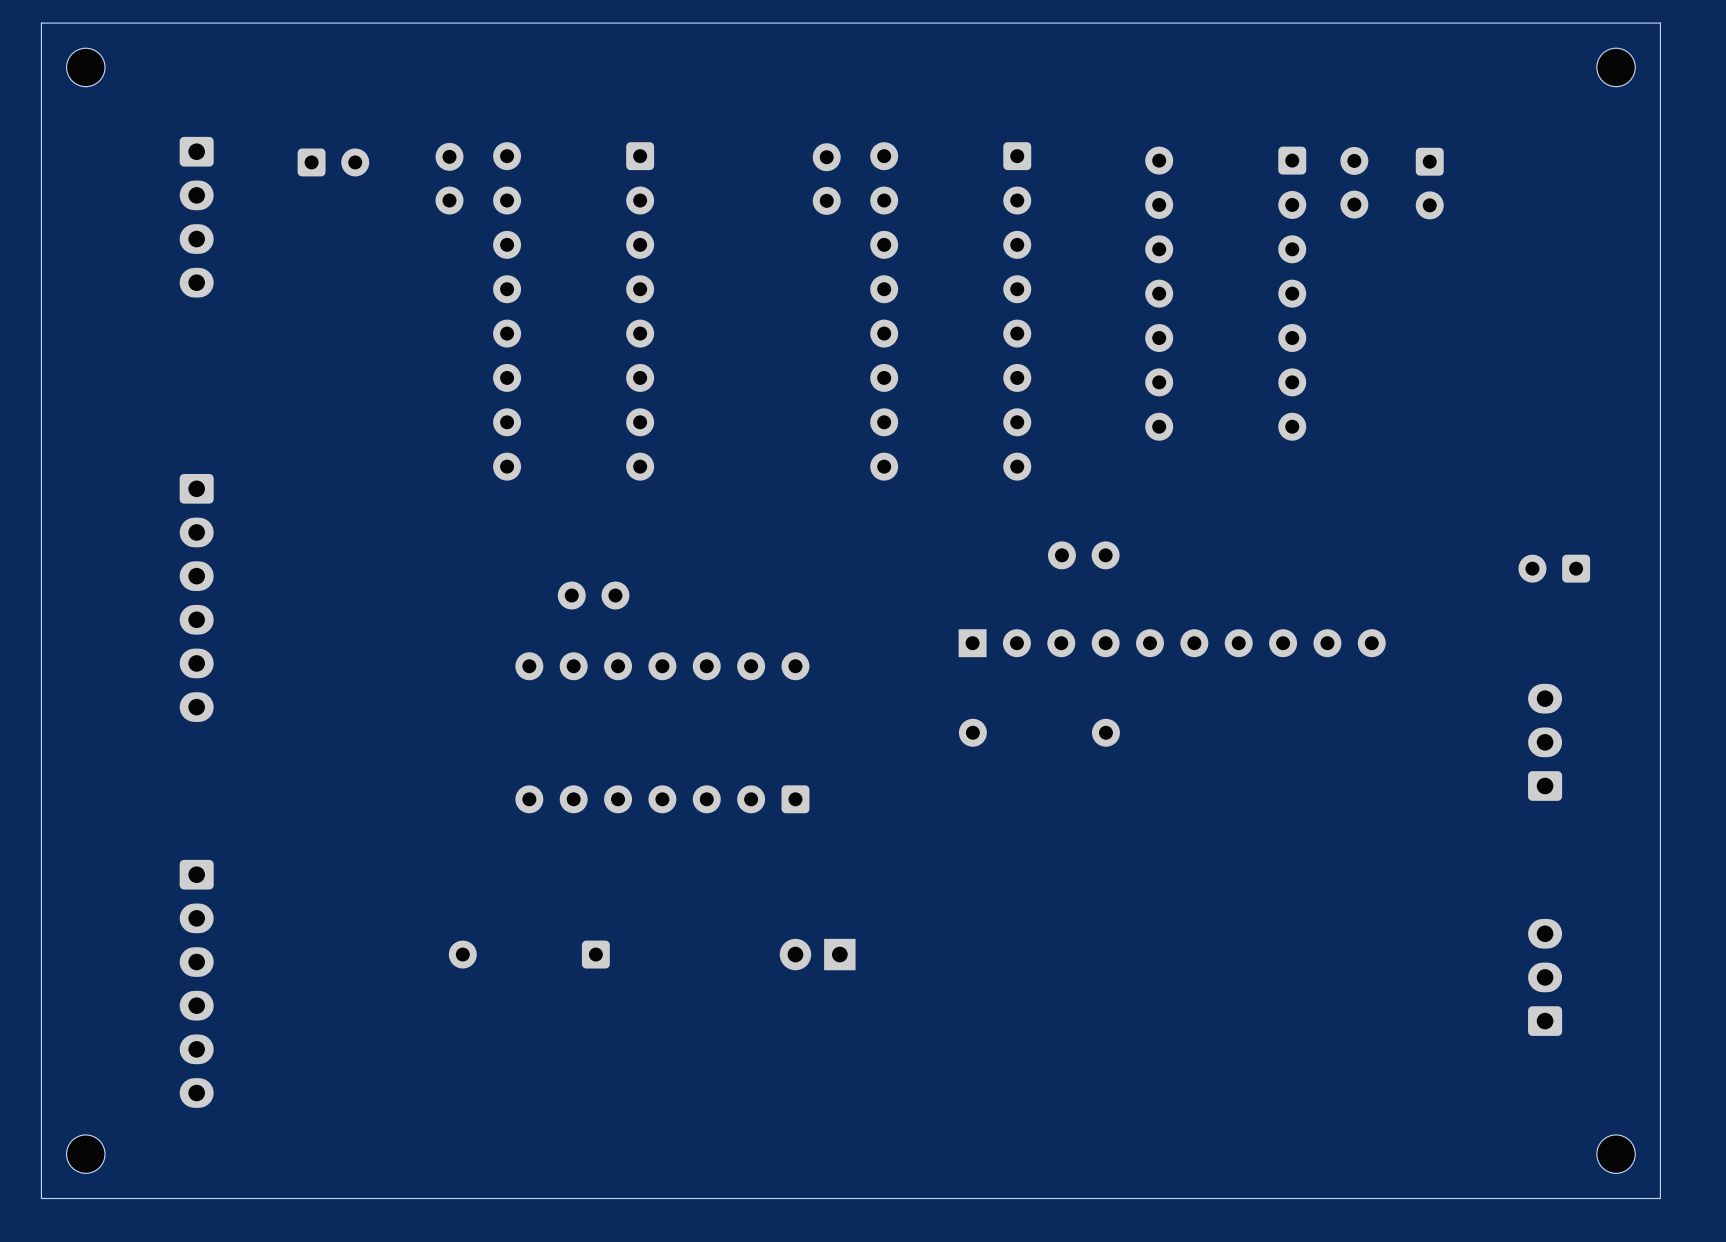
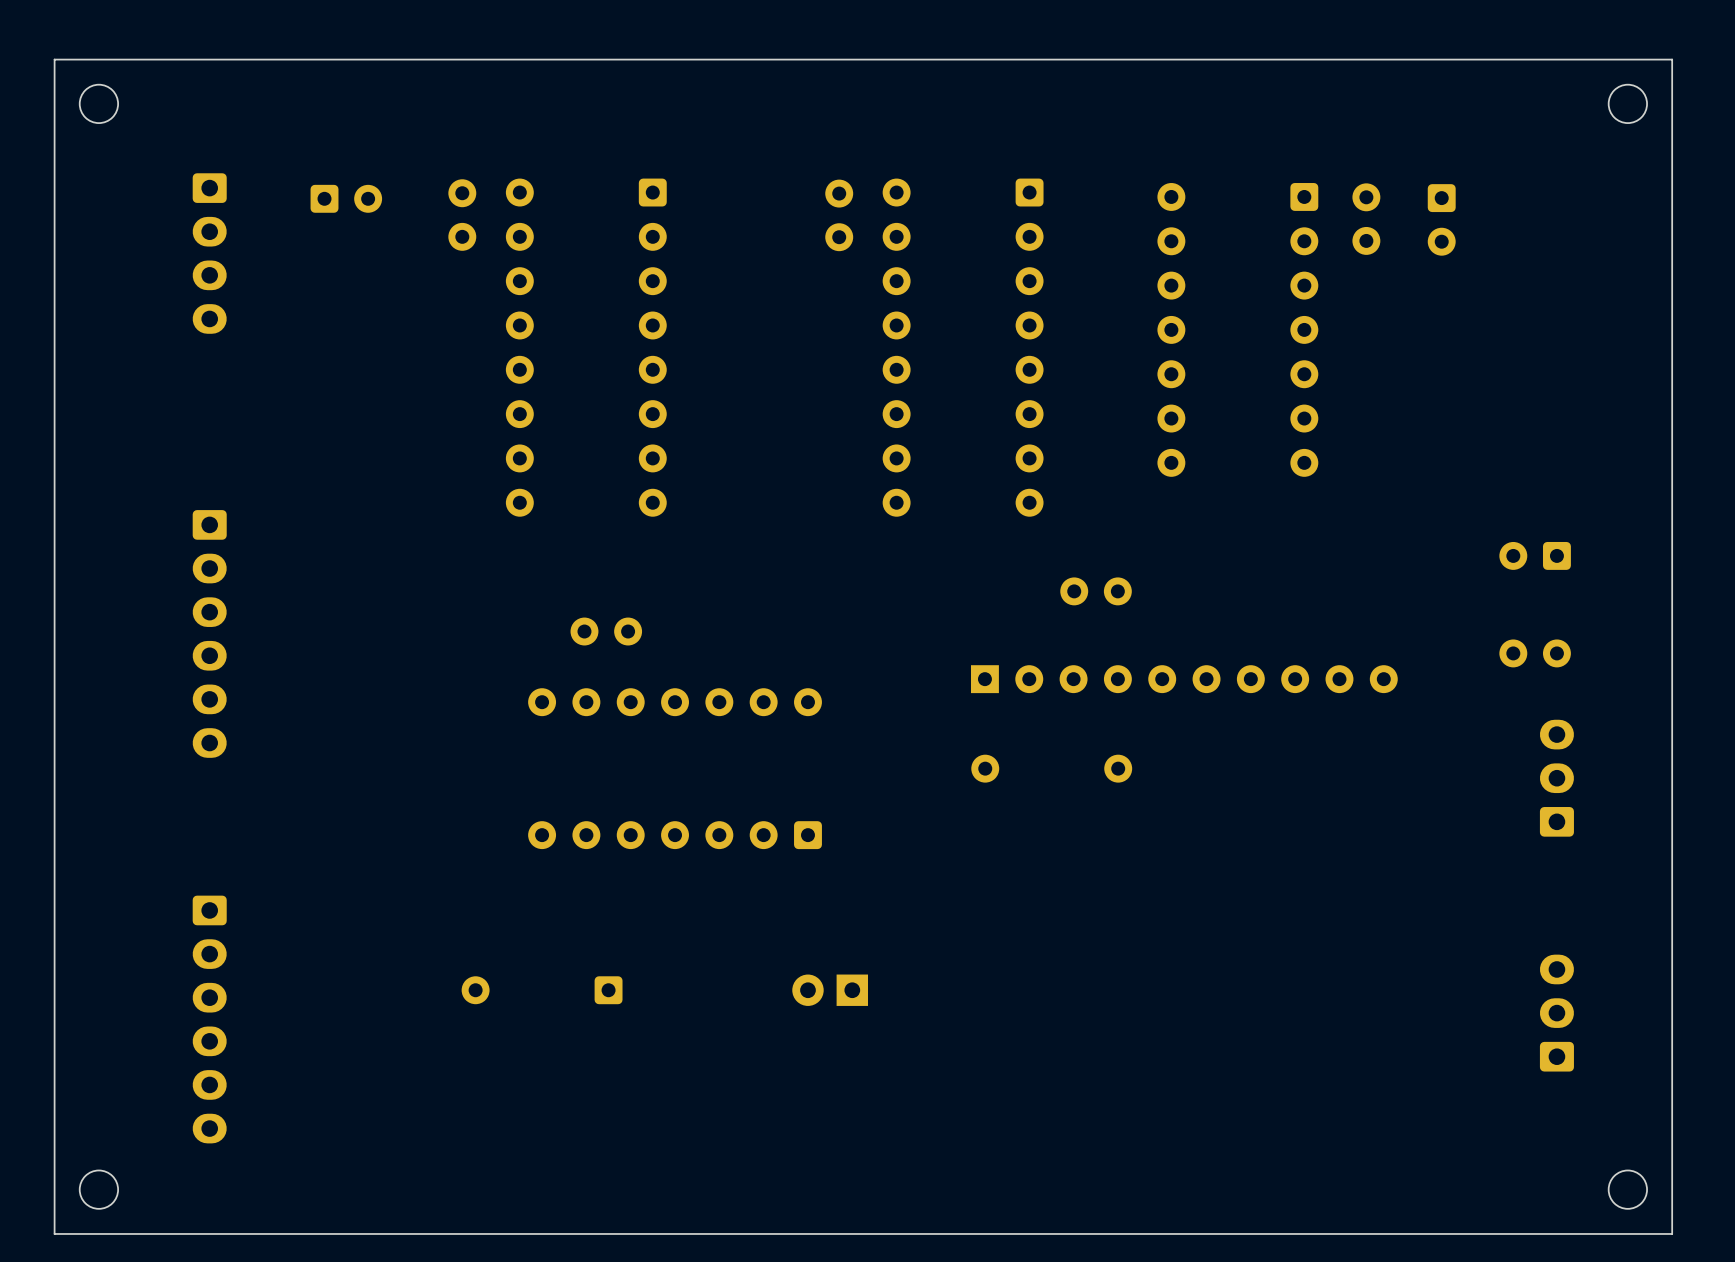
part position: (1554, 568) -> (1535, 555)
part: none -> (1535, 653)

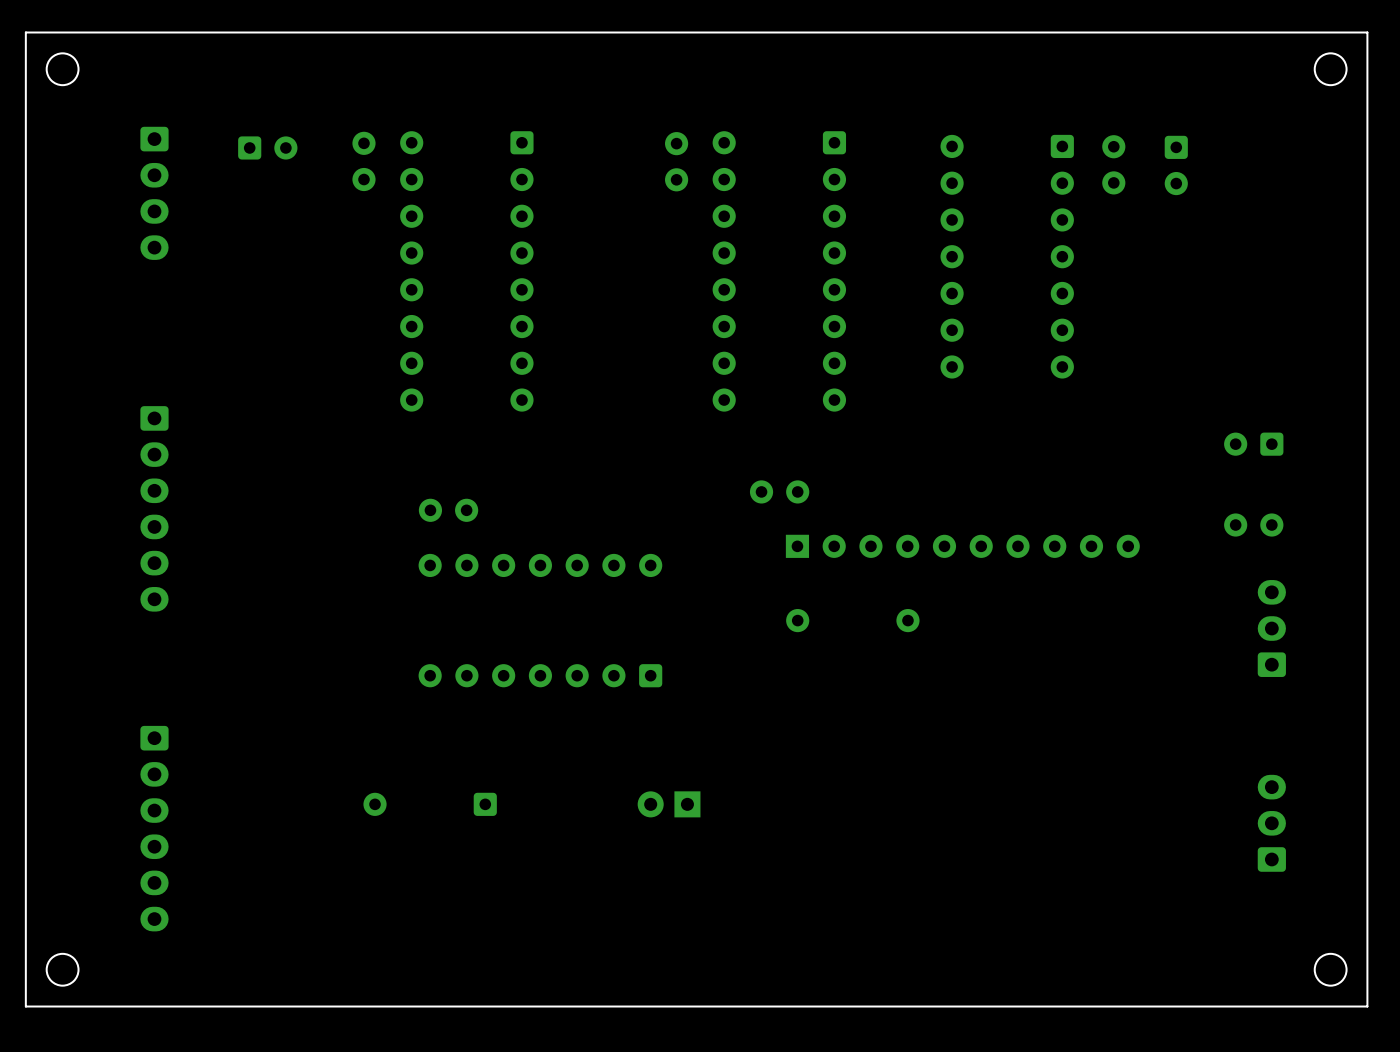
part position: (1096, 591) -> (779, 491)
part position: (606, 631) -> (448, 510)

